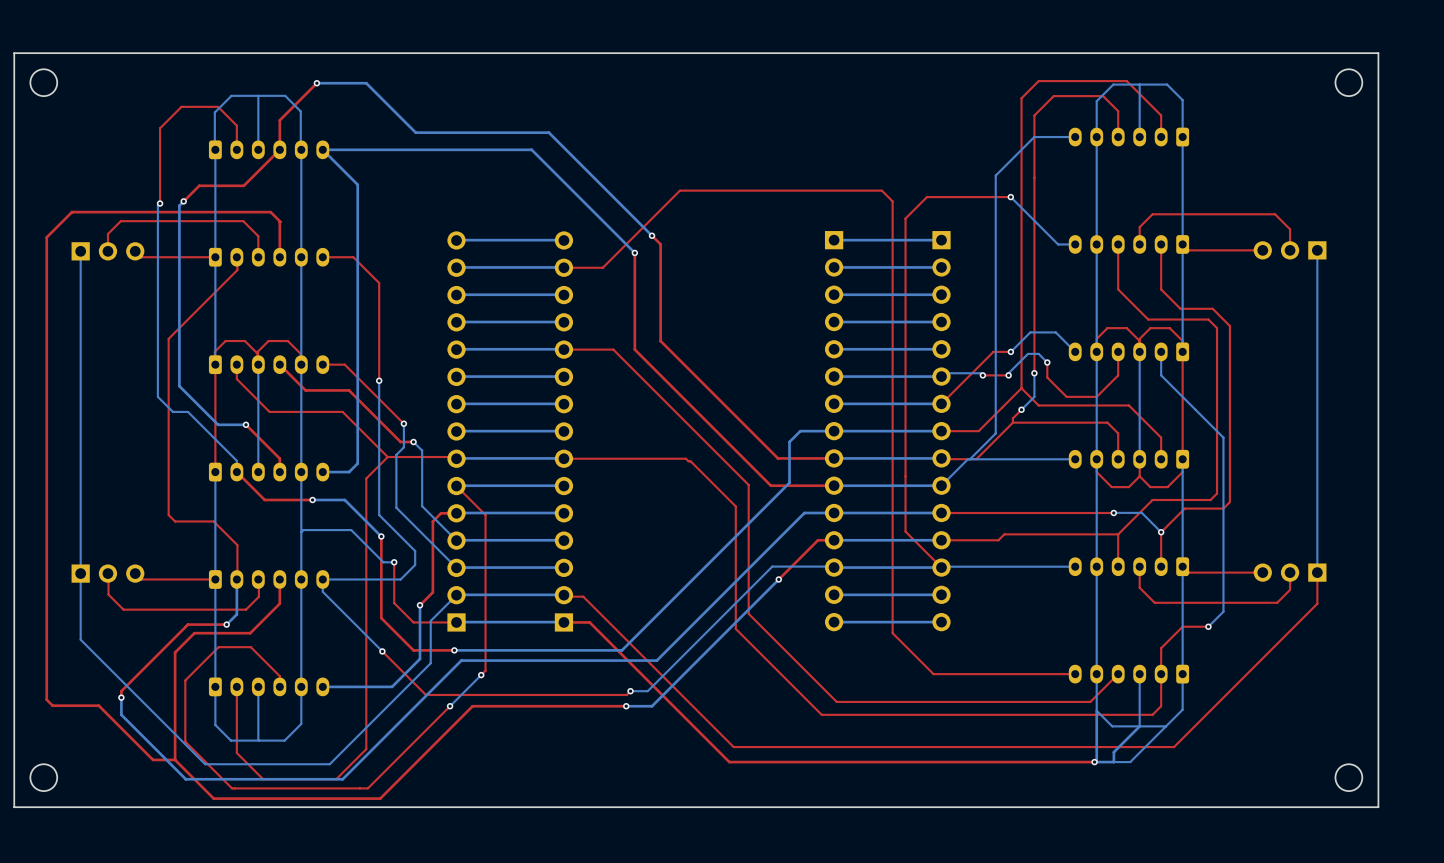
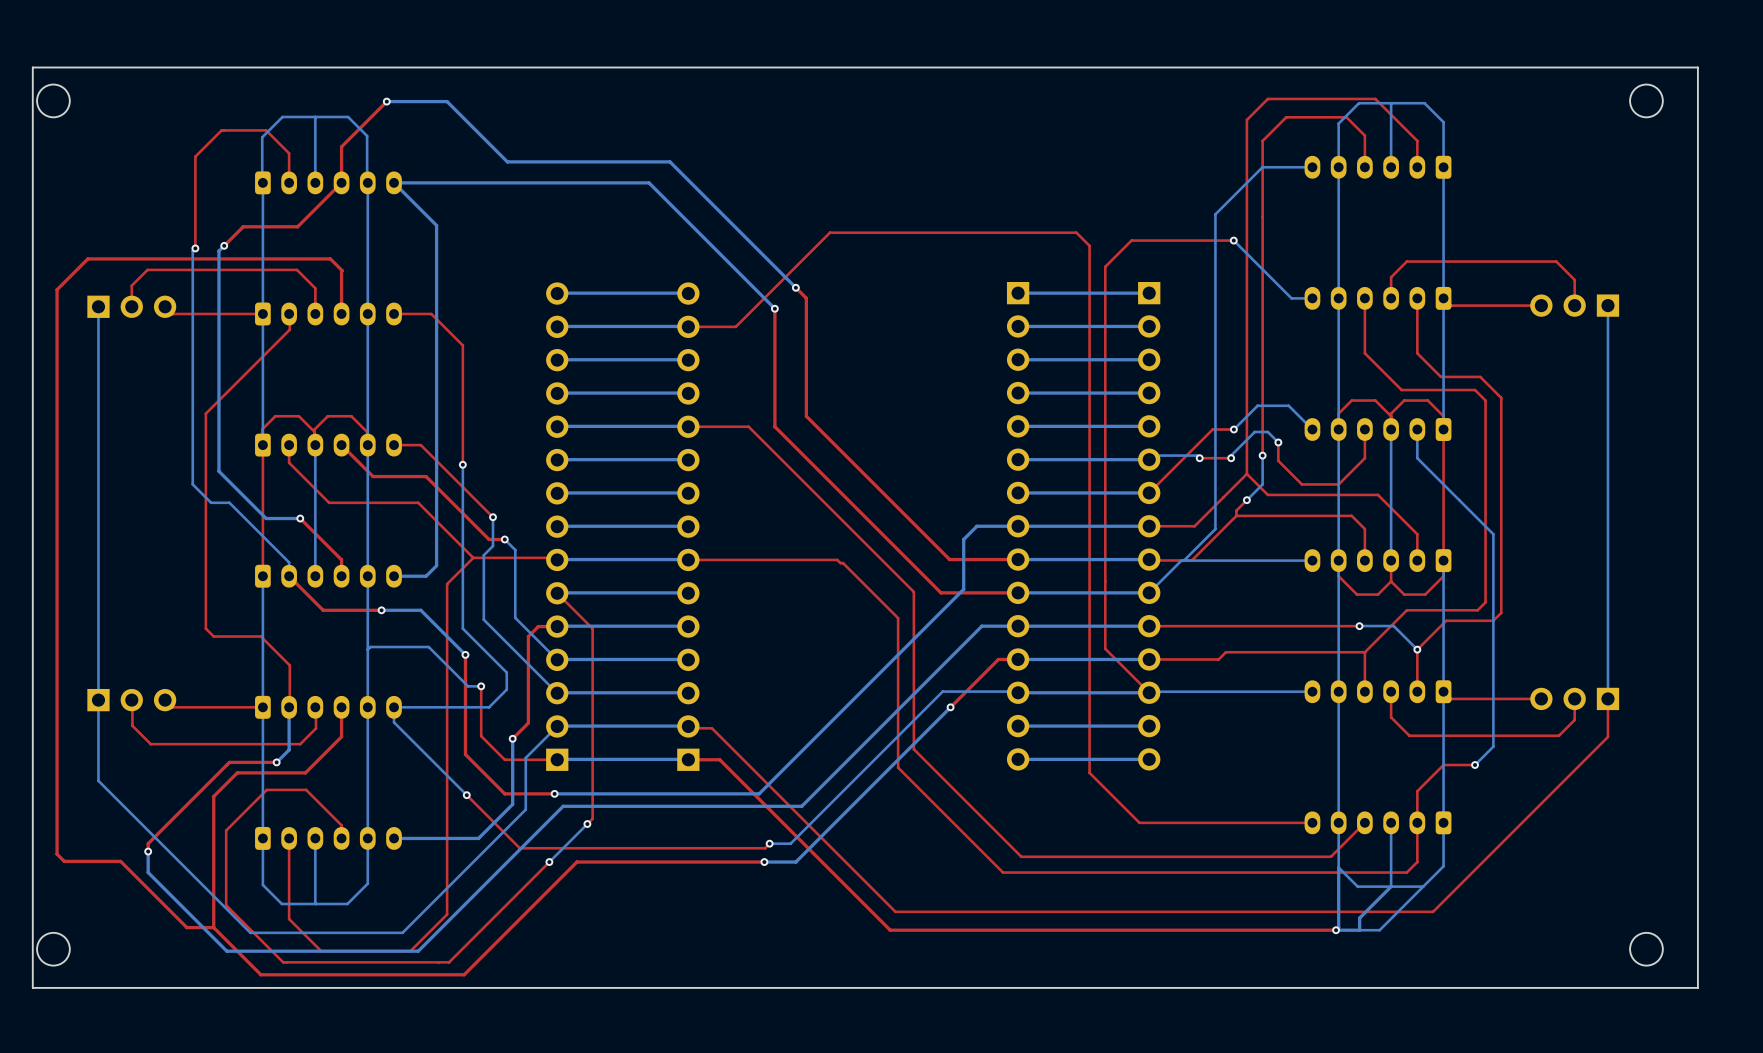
board edge: (1378, 53) (14, 53) (14, 807) (1378, 807) (1378, 53) -> (1697, 67) (32, 67) (32, 987) (1697, 987) (1697, 67)

